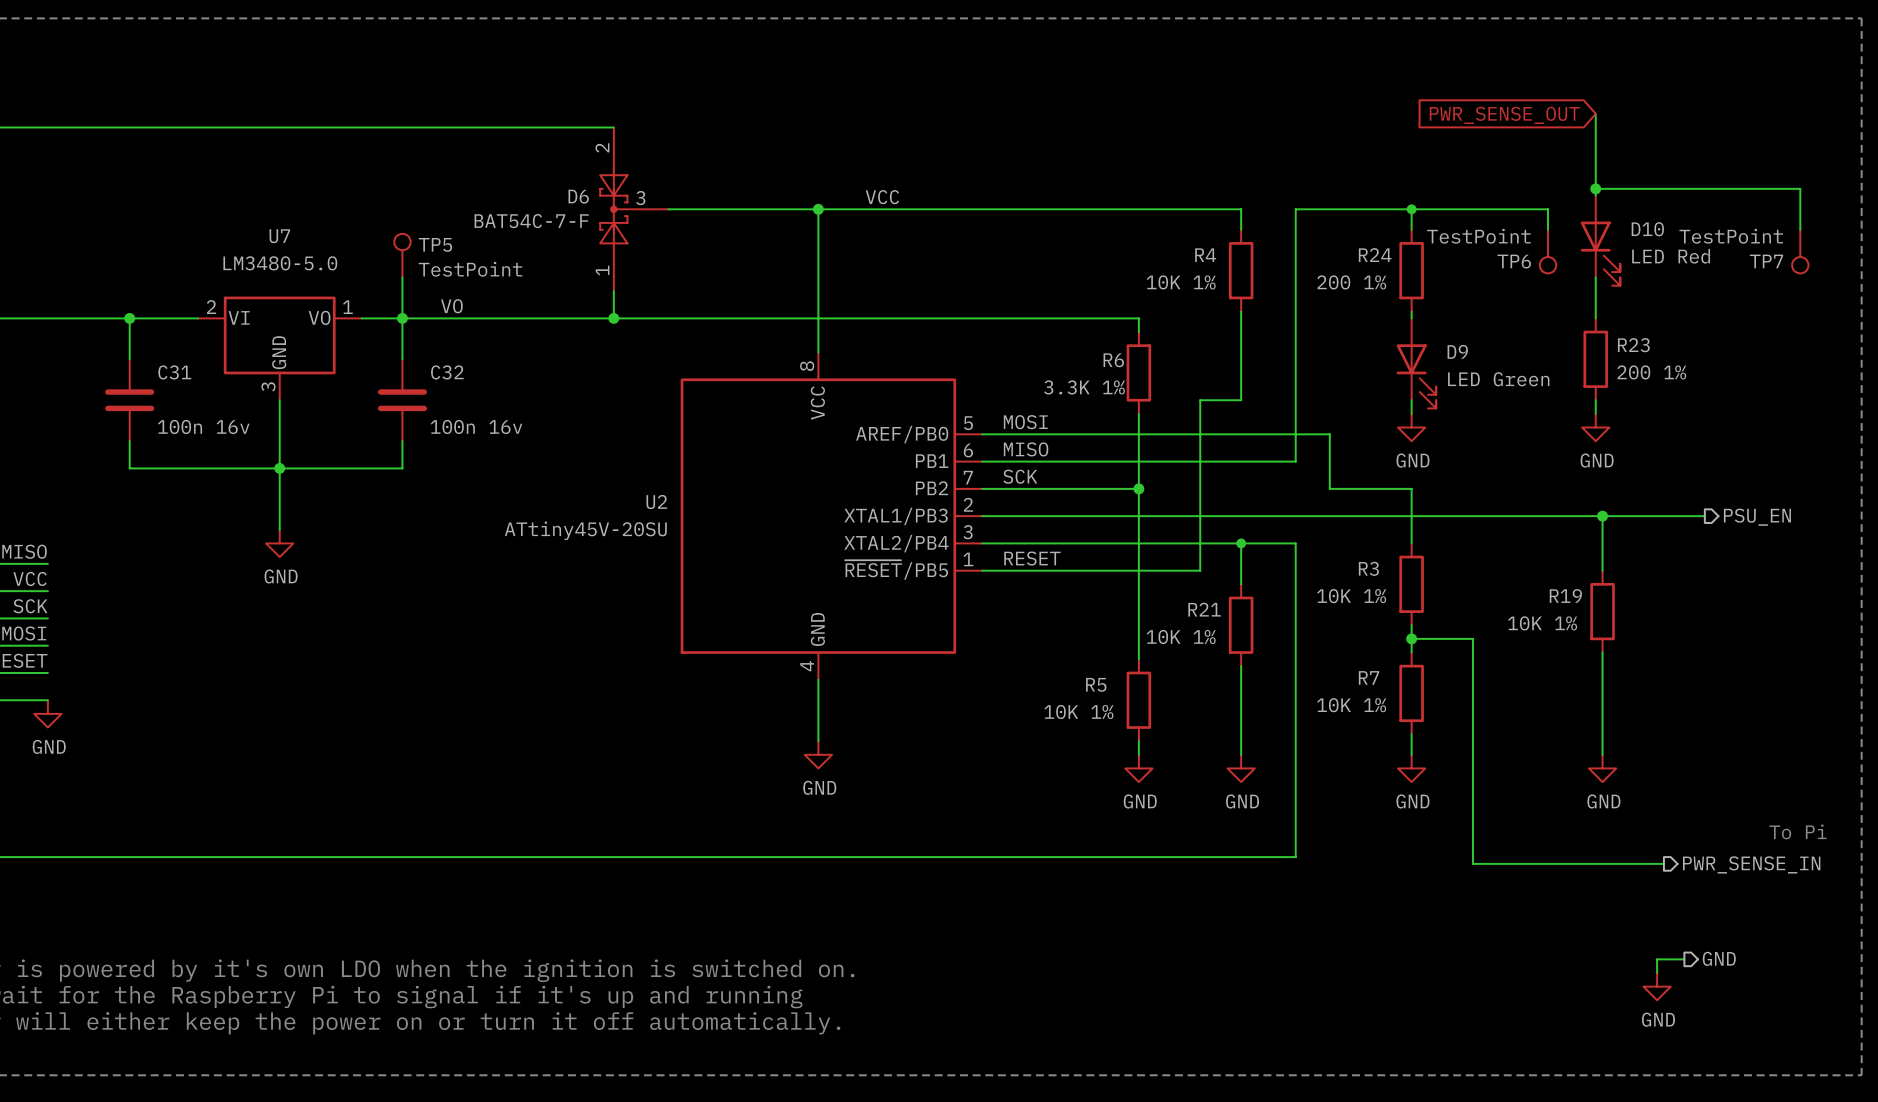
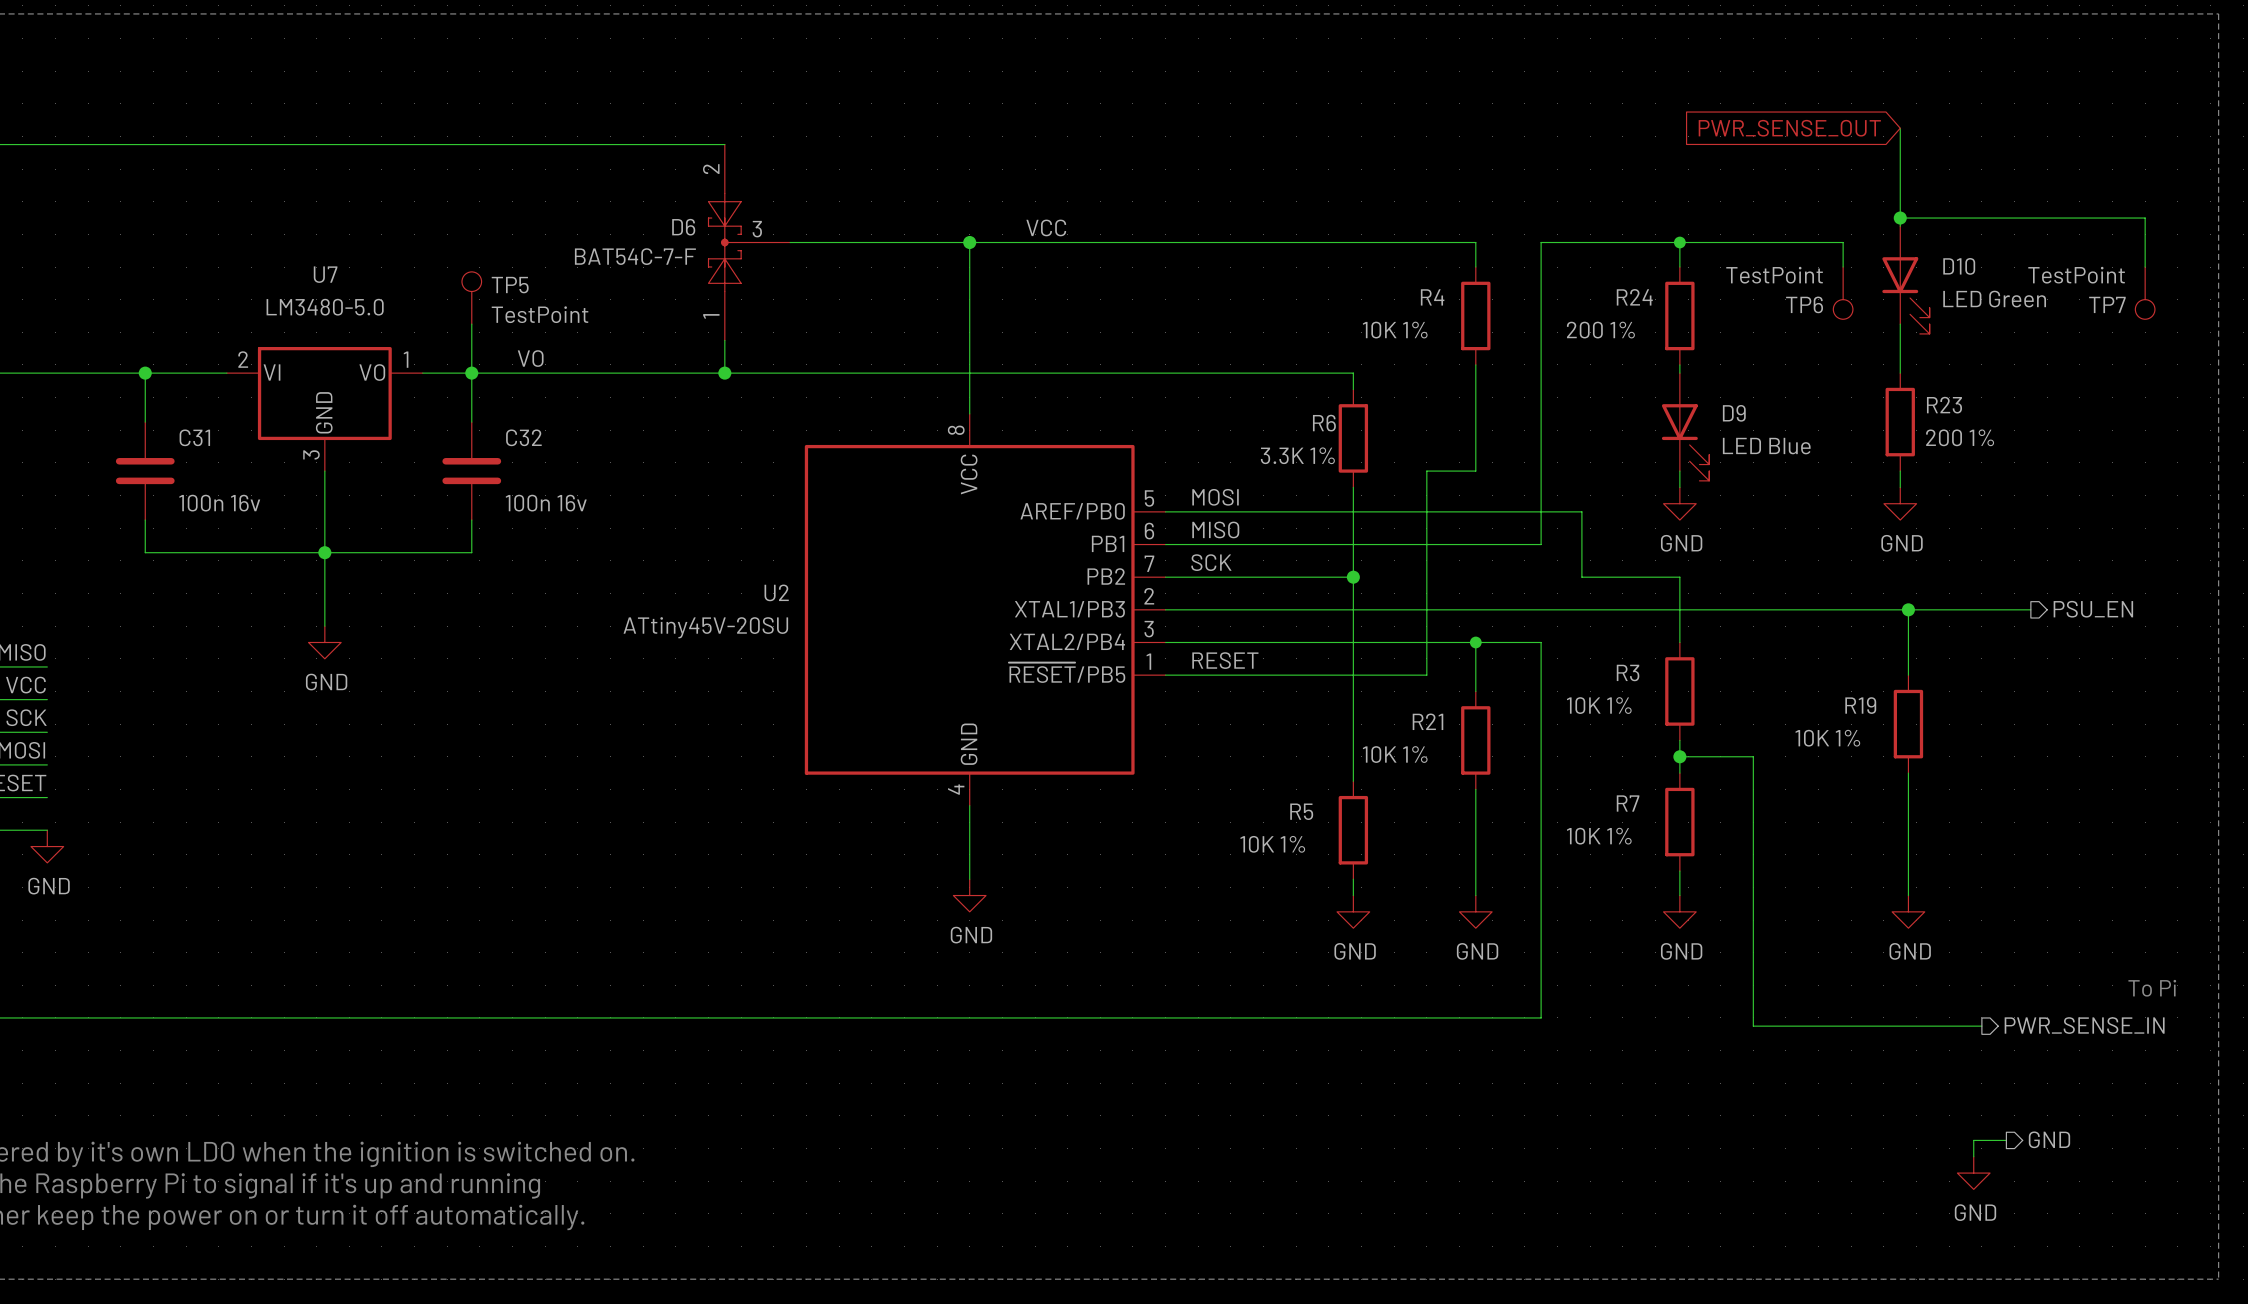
D10 value: LED Red (1671, 256) -> LED Green (1994, 299)
D9 value: LED Green (1498, 379) -> LED Blue (1766, 446)

